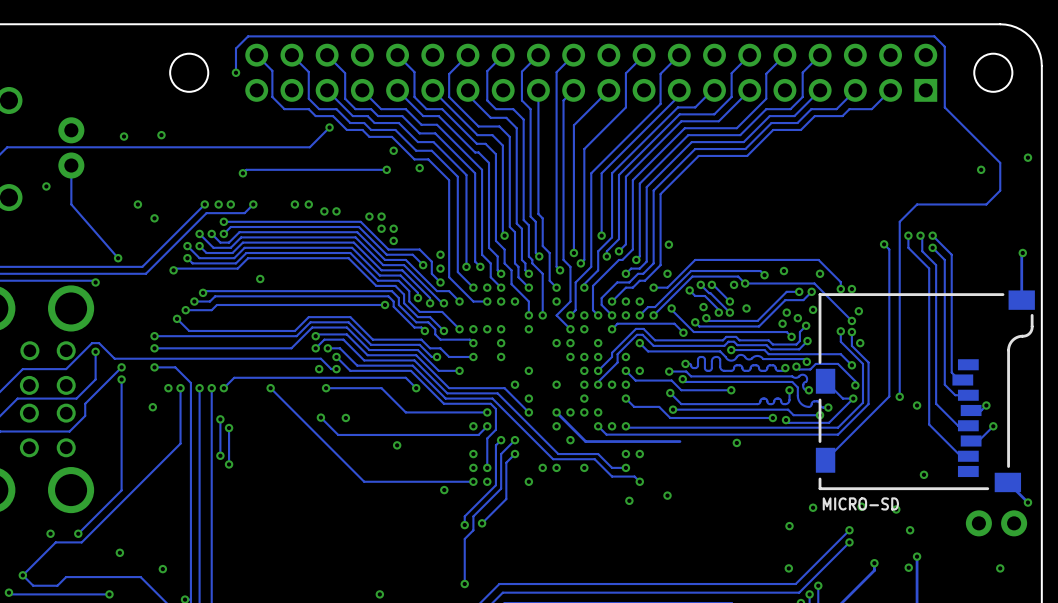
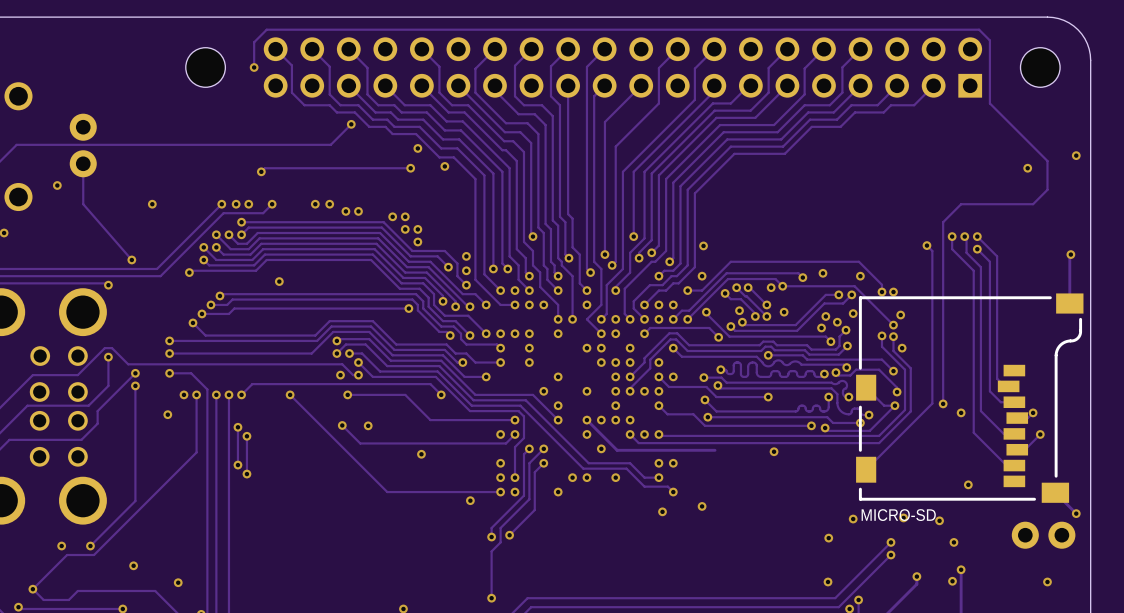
via: (161, 135) -> none
via: (124, 136) -> none
via: (154, 218) -> none

